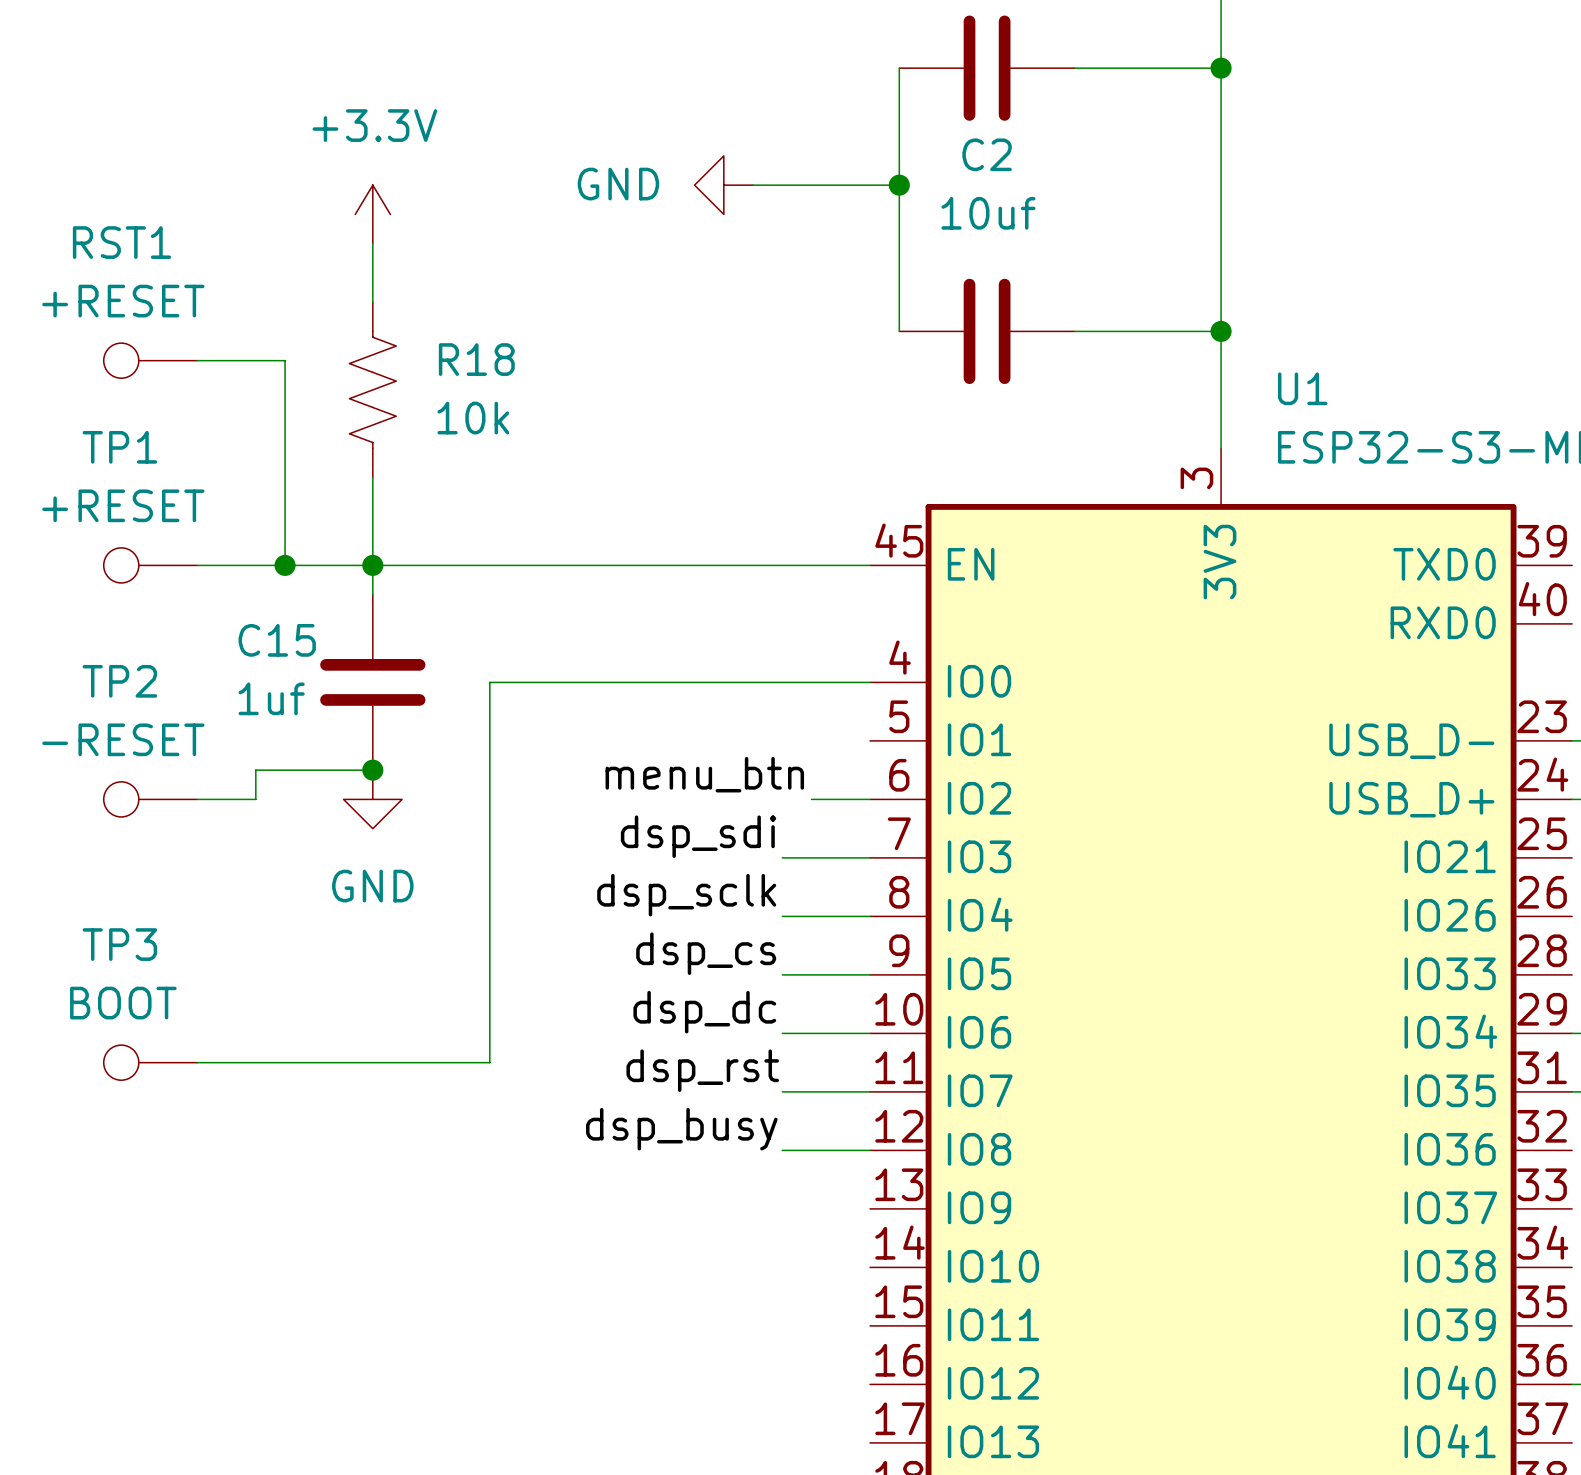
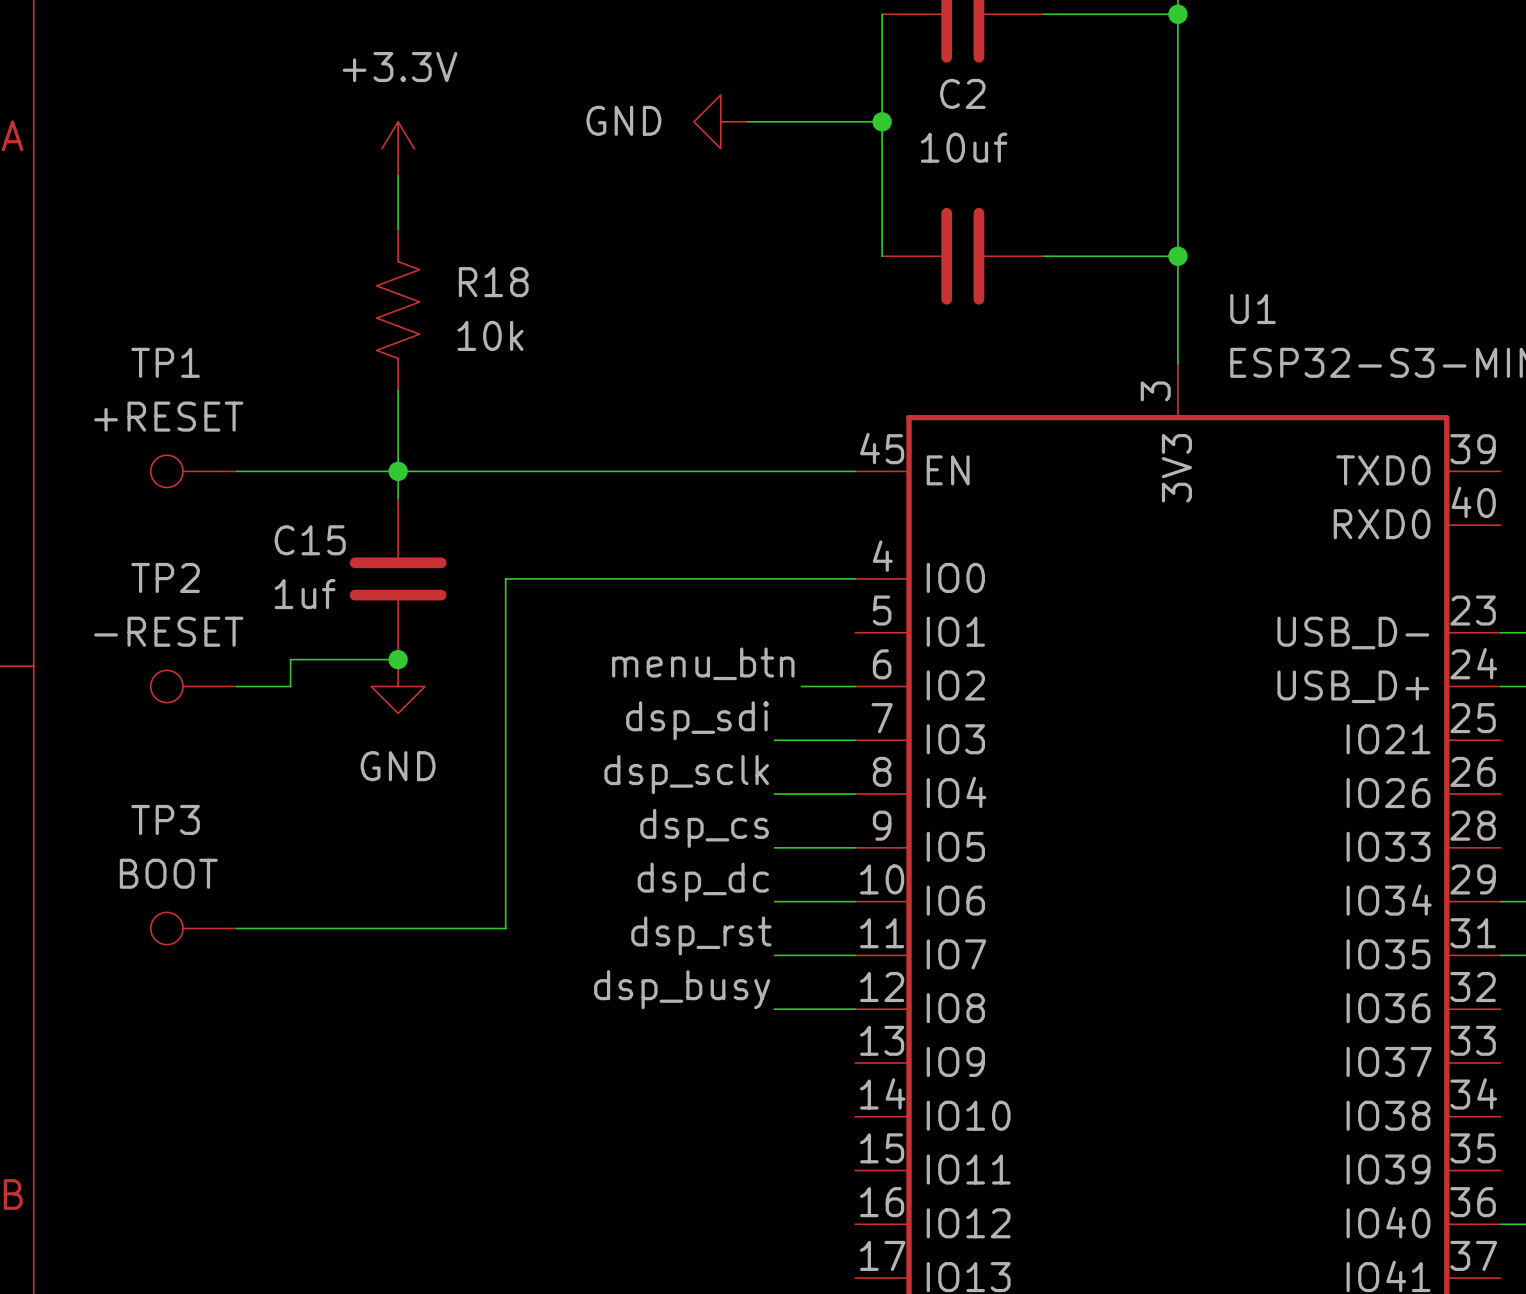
RST1: +RESET (150, 360) -> none
wire: (197, 360) (285, 360) (285, 565) -> none
junction: (285, 565) -> none

